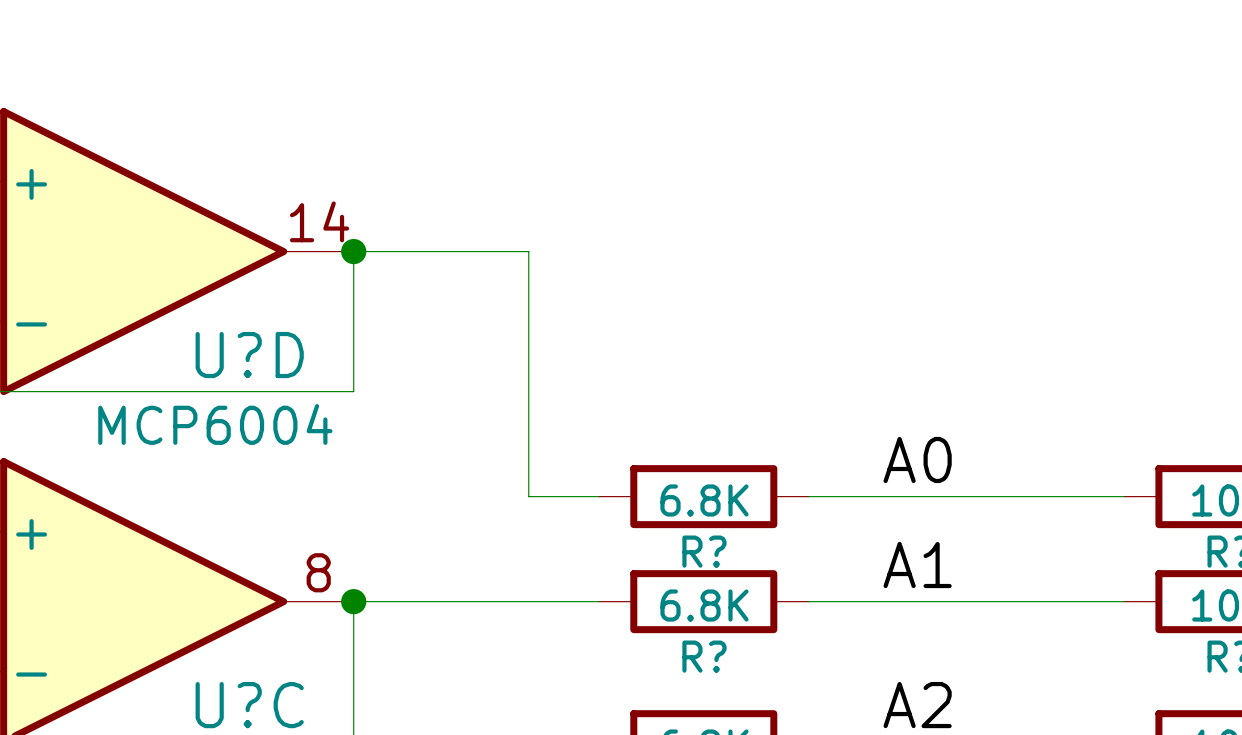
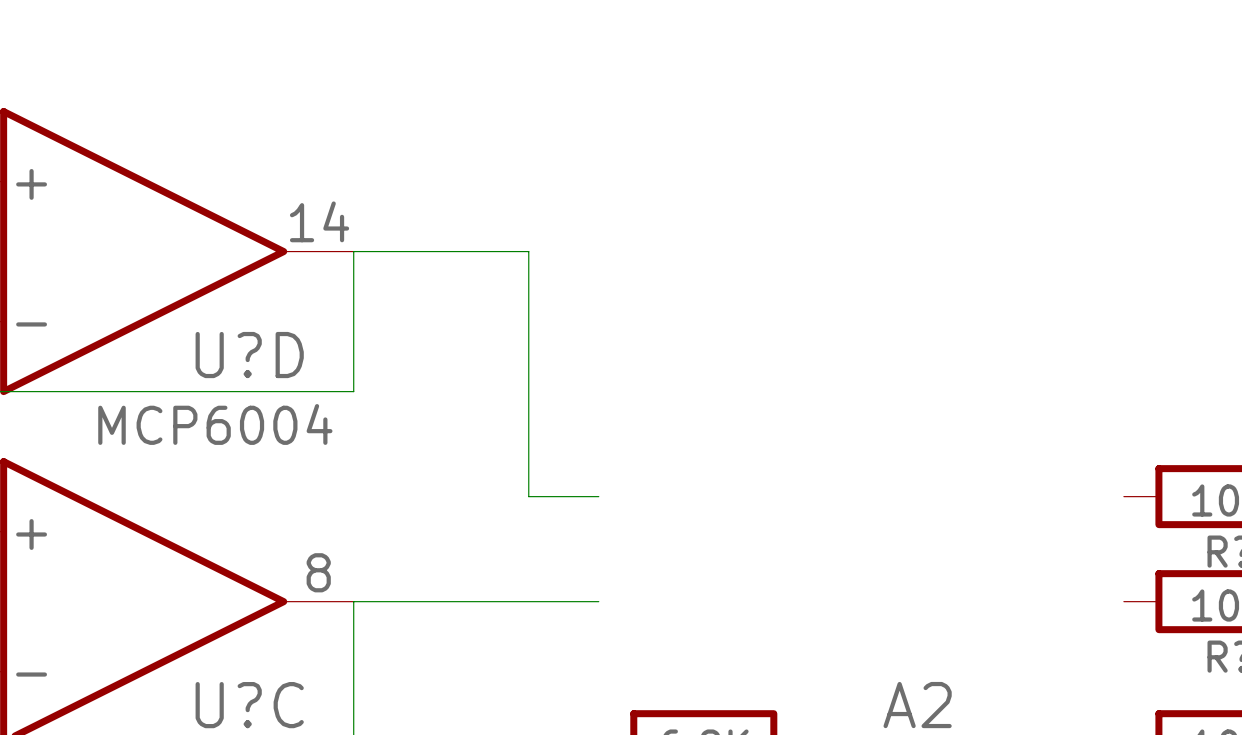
junction: (353, 251) -> none
label: A0 (917, 459) -> none
R?: 6.8K (703, 496) -> none
wire: (808, 496) (1123, 496) -> none
label: A1 (917, 565) -> none
junction: (353, 601) -> none
R?: 6.8K (703, 601) -> none
wire: (808, 601) (1123, 601) -> none

